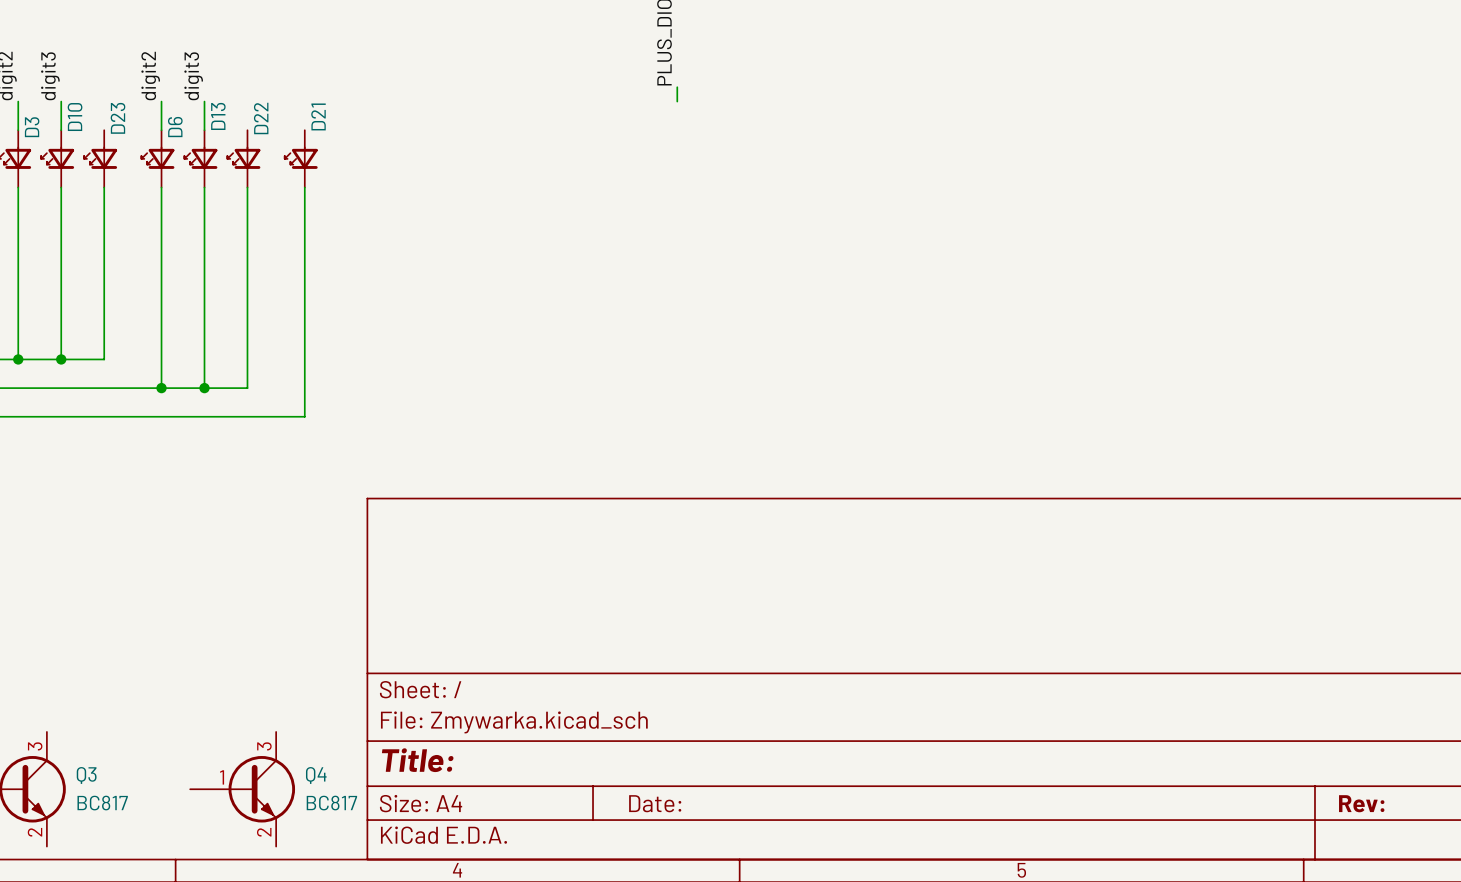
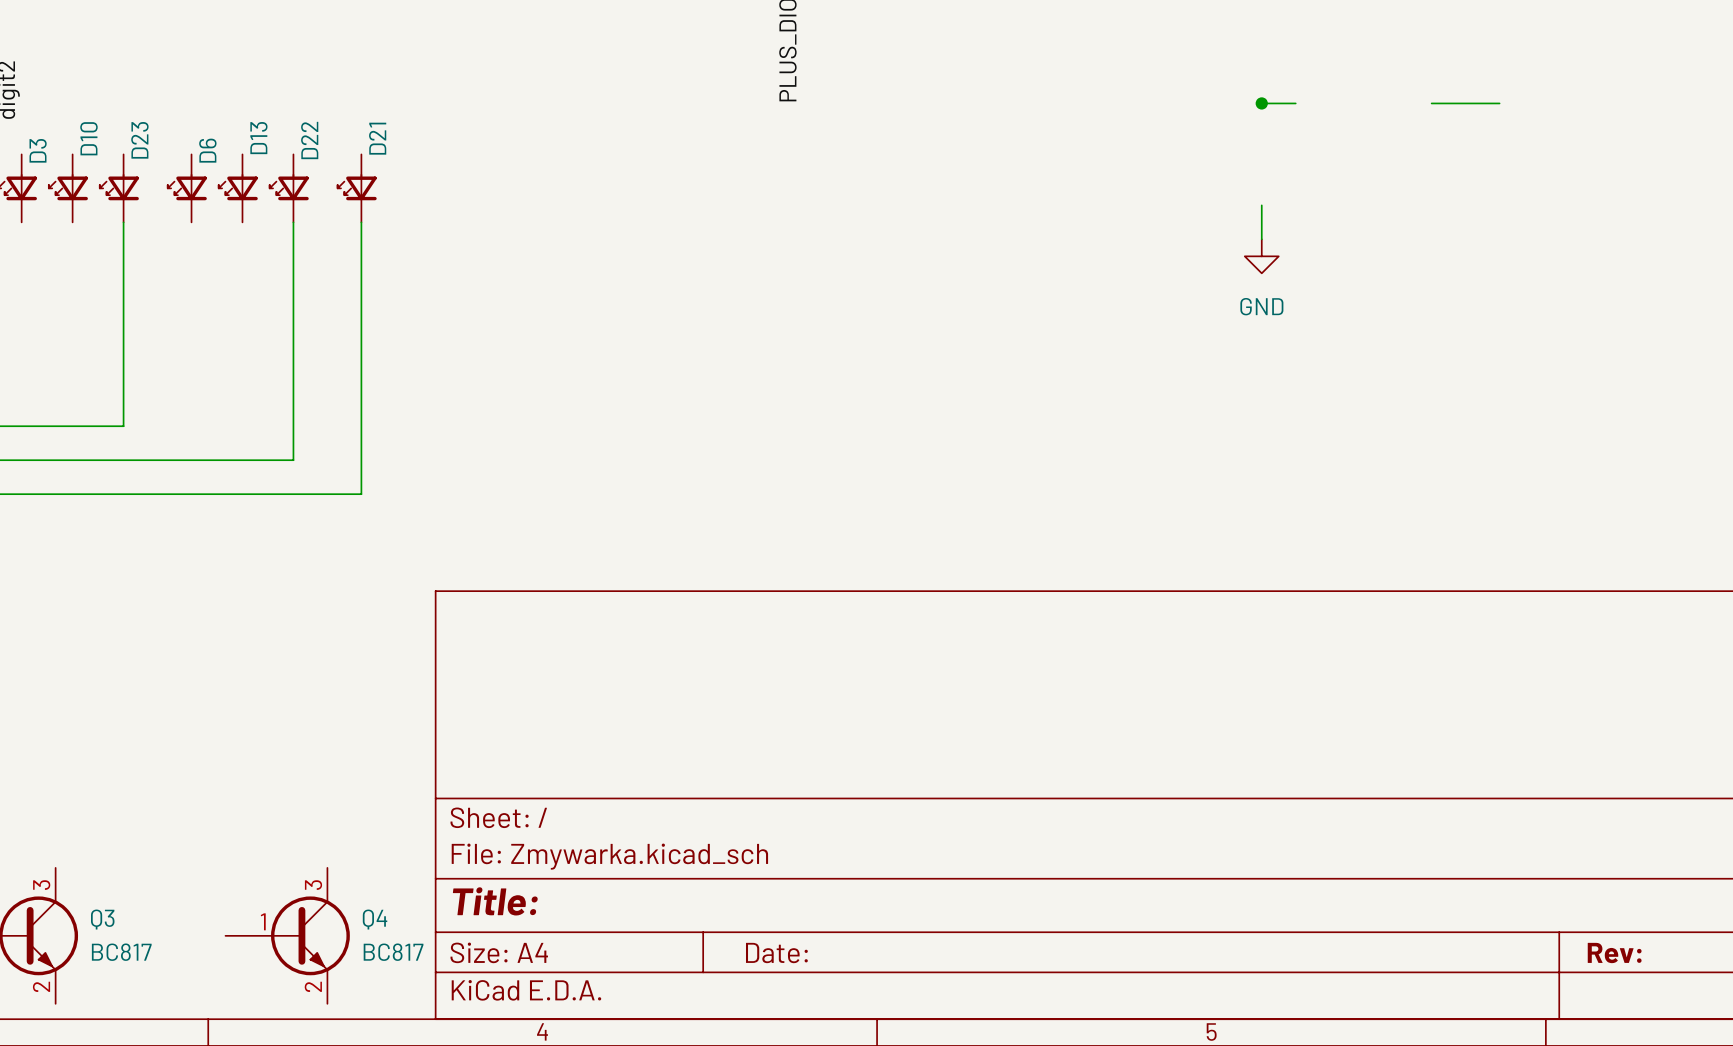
label: digit3 (50, 76) -> none
label: digit2 (150, 76) -> none
label: digit3 (193, 76) -> none
wire: (677, 87) (677, 101) -> none
wire: none -> (1261, 103) (1295, 103)
junction: none -> (1261, 103)
wire: none -> (1431, 103) (1499, 103)
wire: (18, 101) (18, 130) -> none
wire: (61, 101) (61, 130) -> none
wire: (161, 101) (161, 130) -> none
wire: (204, 101) (204, 130) -> none
wire: none -> (1261, 205) (1261, 239)
wire: (18, 187) (18, 359) -> none
wire: (61, 187) (61, 359) -> none
wire: (161, 187) (161, 388) -> none
wire: (204, 187) (204, 388) -> none
power symbol: none -> GND (1261, 256)
junction: (18, 359) -> none
junction: (61, 359) -> none
junction: (161, 388) -> none
junction: (204, 388) -> none

